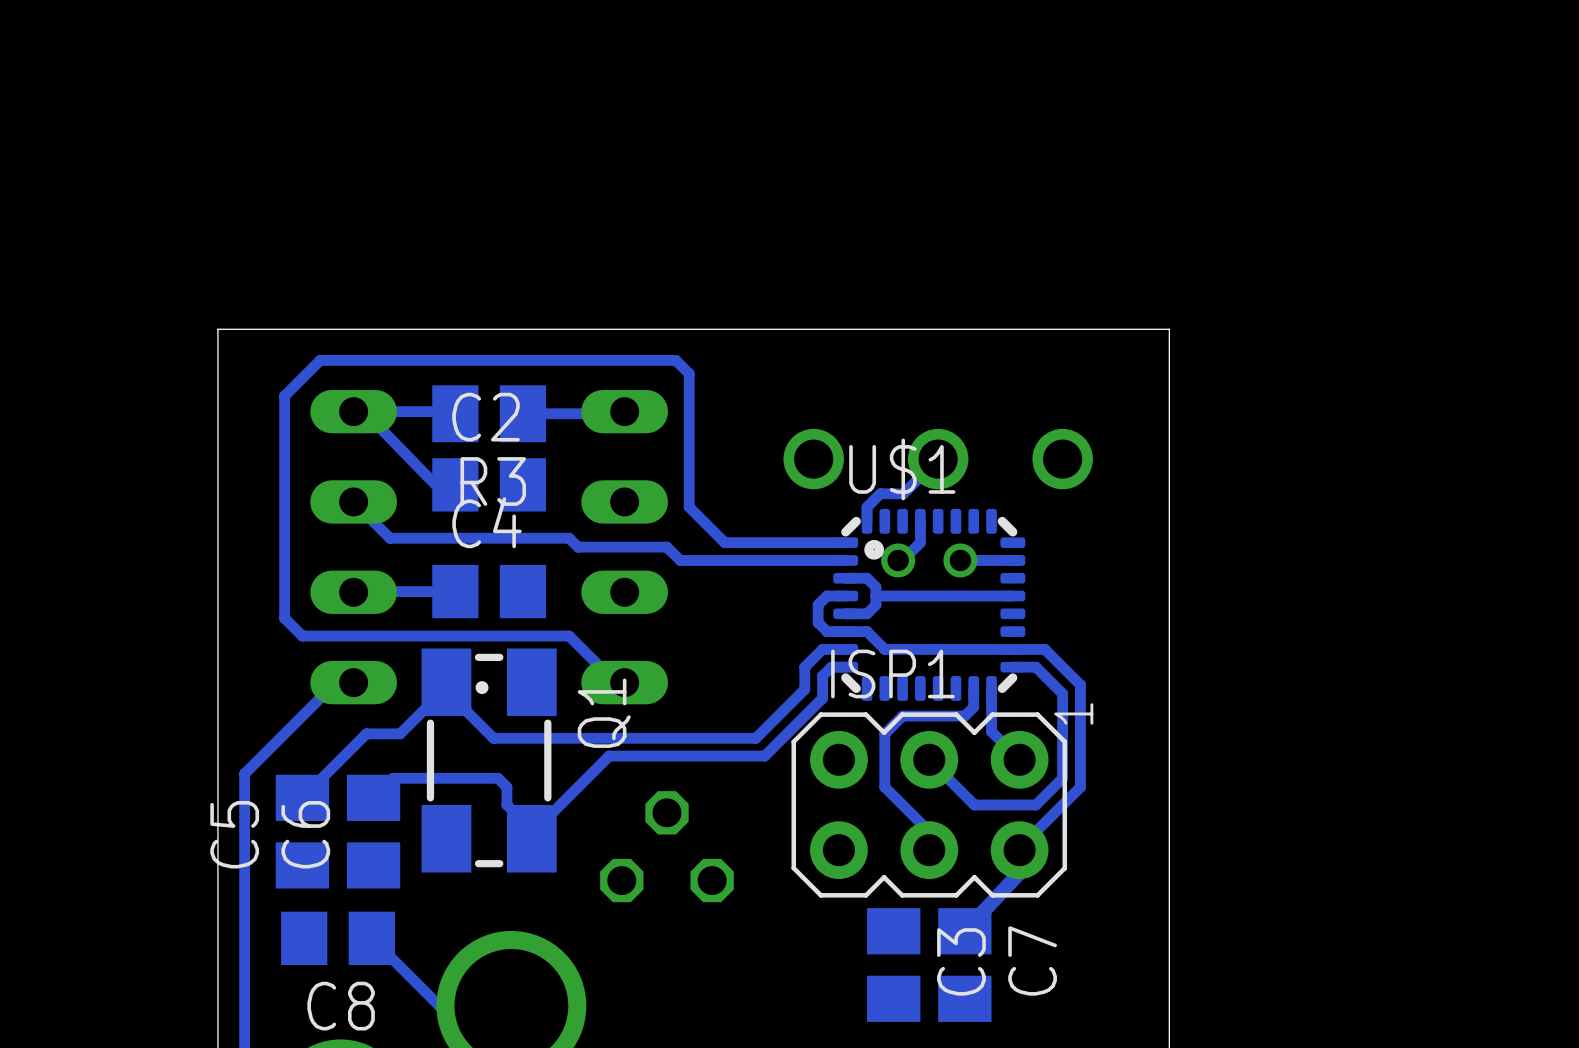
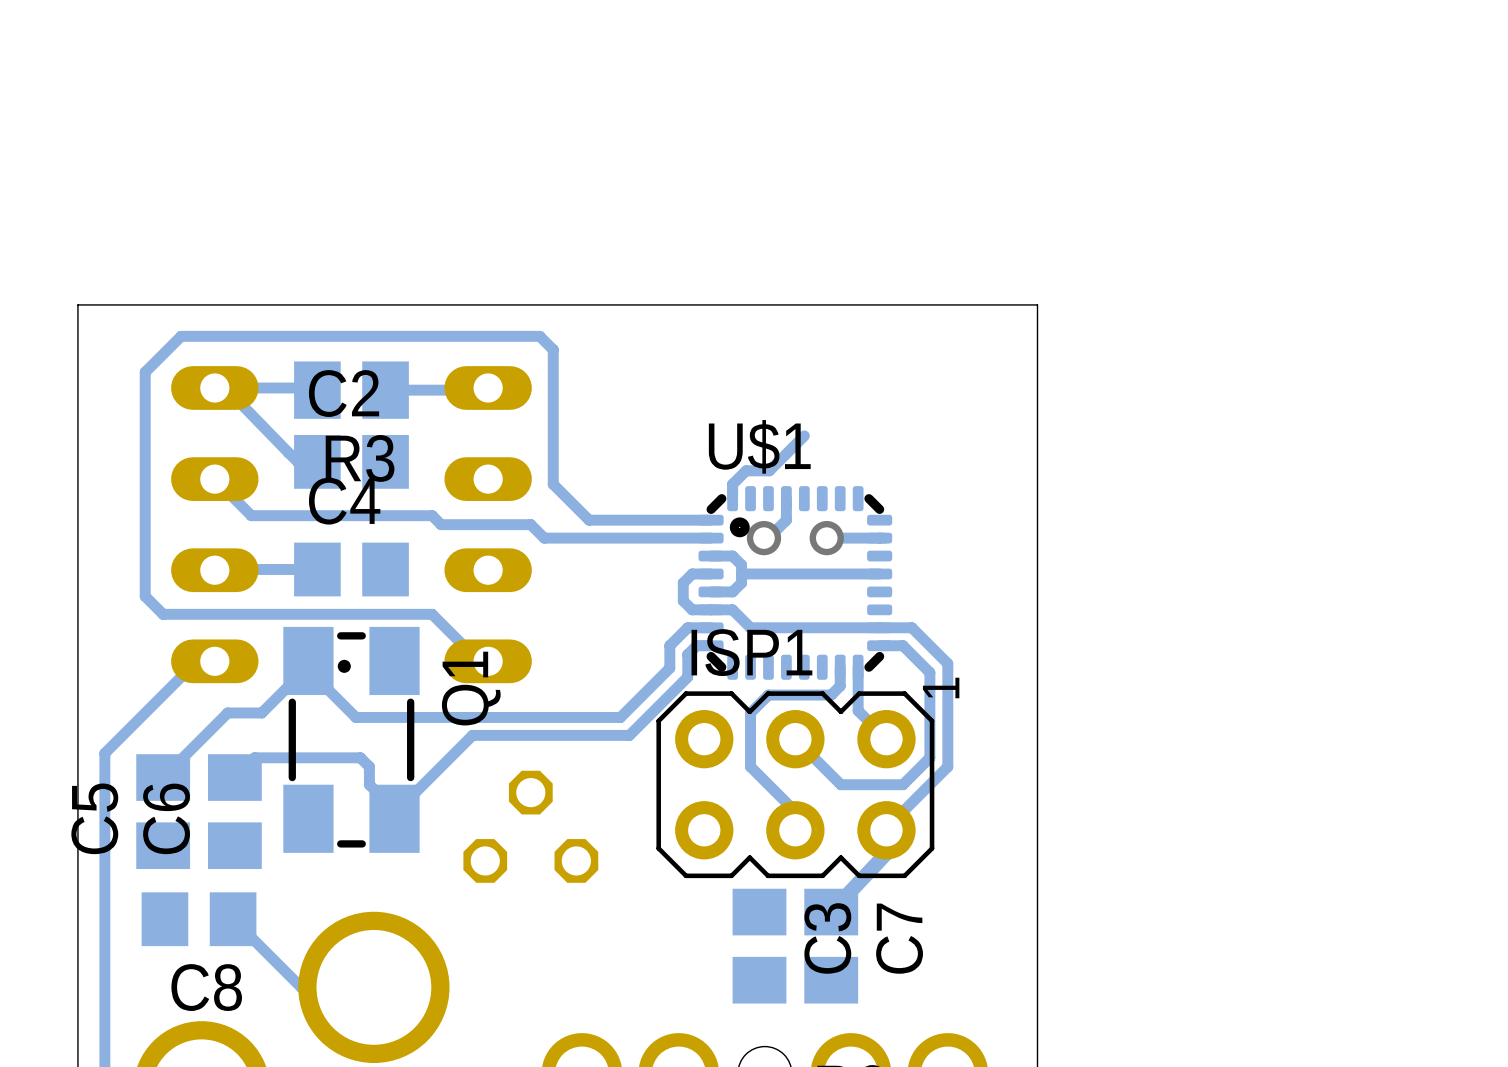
part: (938, 459) -> none

